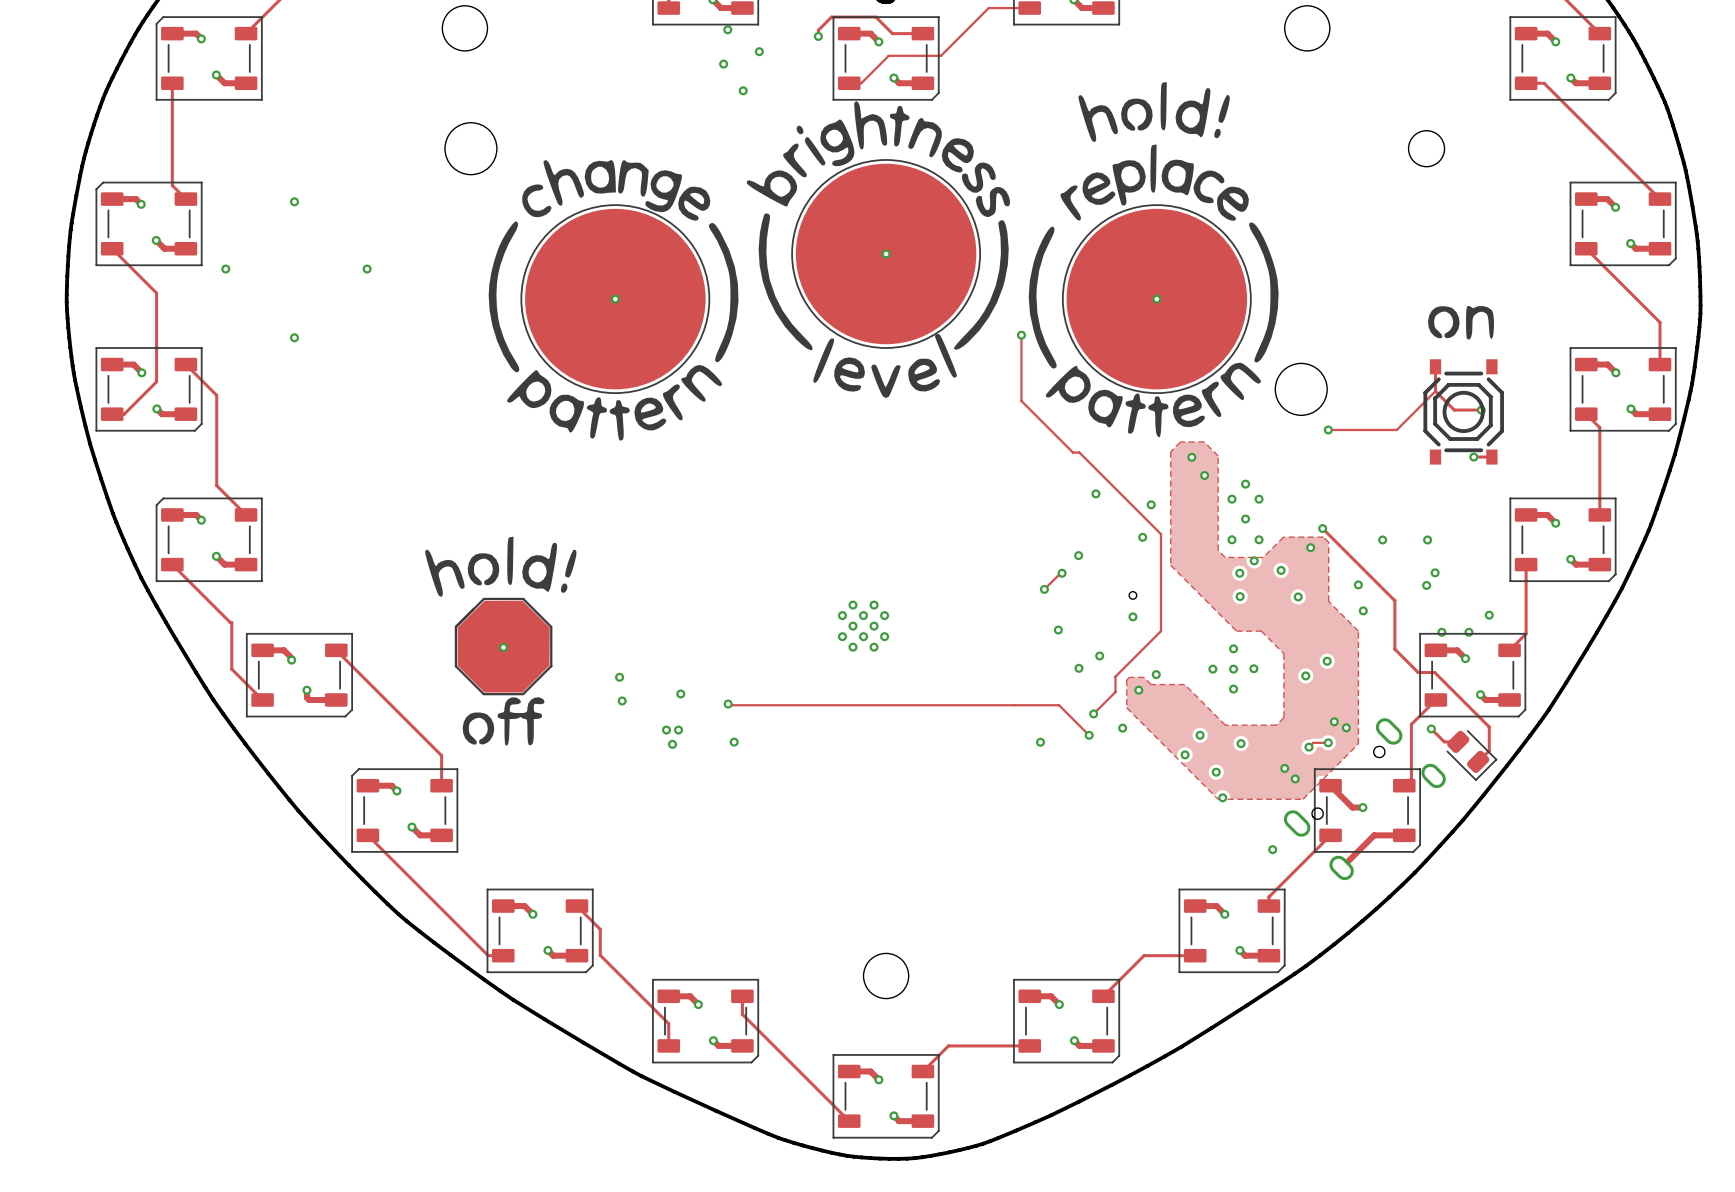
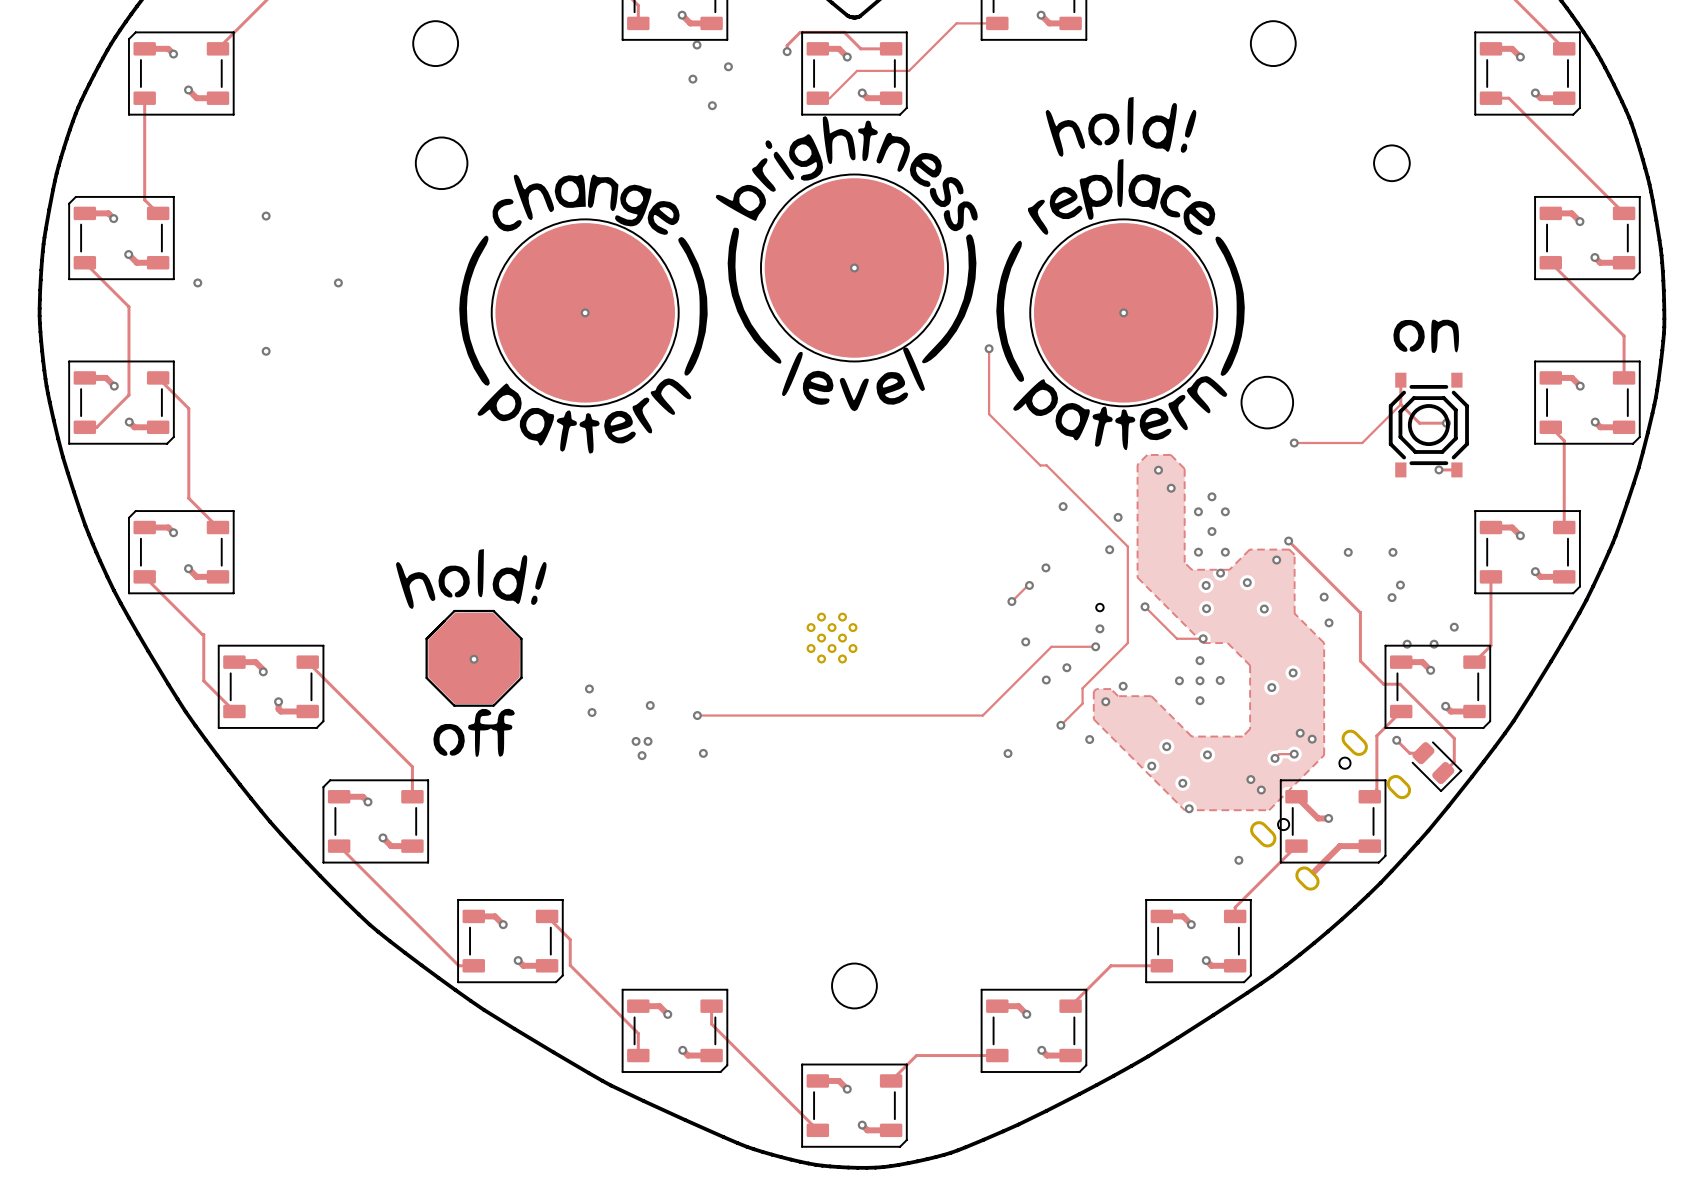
track: none -> (1145, 606) (1177, 638) (1203, 638)
via: none -> (1145, 606)
via: none -> (1203, 638)
track: none -> (1095, 646) (1051, 646) (982, 715) (695, 715)
via: none -> (1095, 646)
track: (728, 704) (1059, 705) (1089, 735) -> none
via: (1089, 735) -> none

